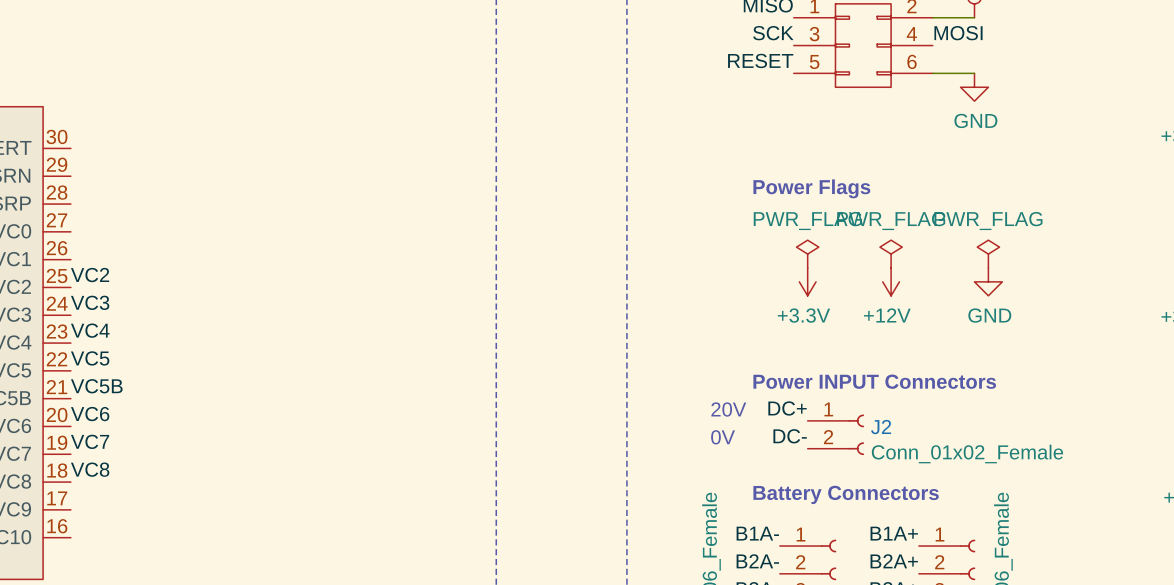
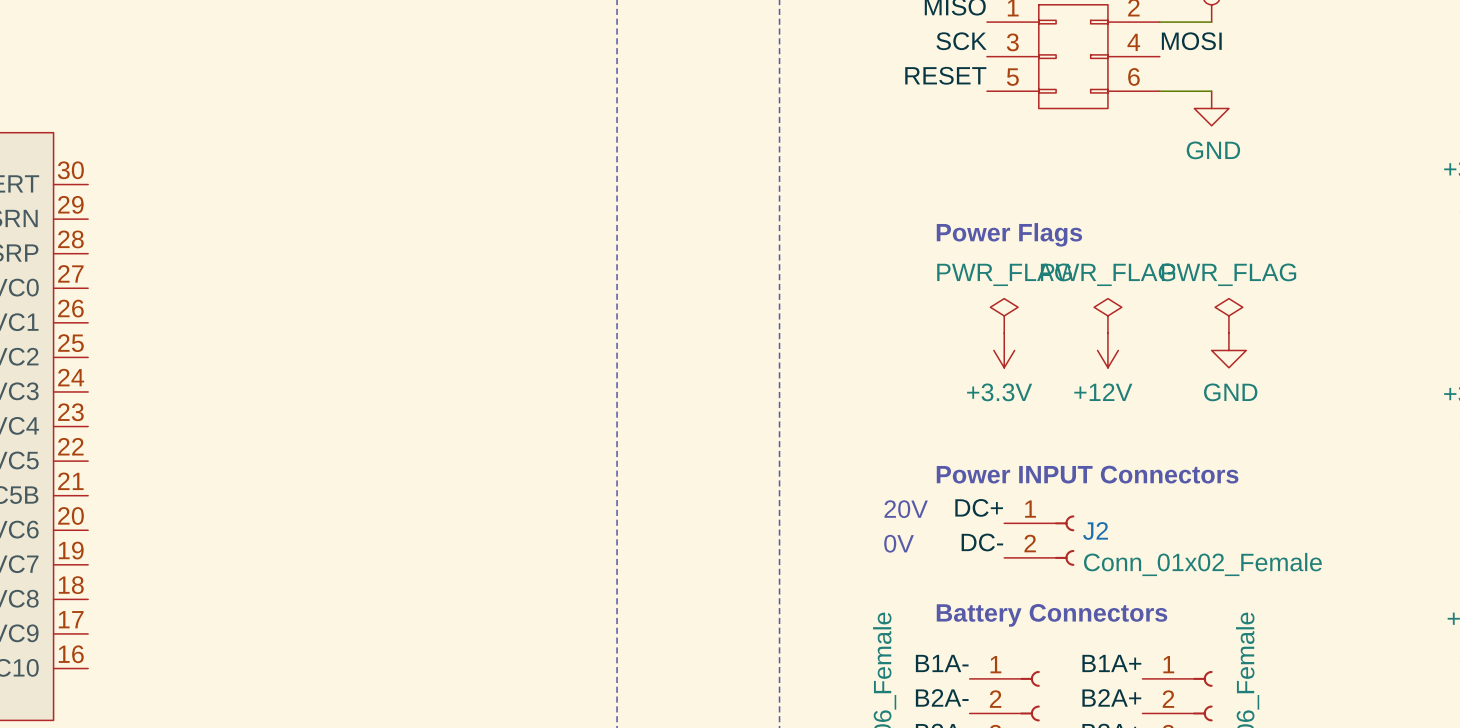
label: VC2 (90, 275) -> none
label: VC3 (90, 302) -> none
label: VC4 (90, 330) -> none
label: VC5 (90, 358) -> none
label: VC5B (96, 386) -> none
label: VC6 (90, 414) -> none
label: VC7 (90, 441) -> none
label: VC8 (90, 469) -> none

